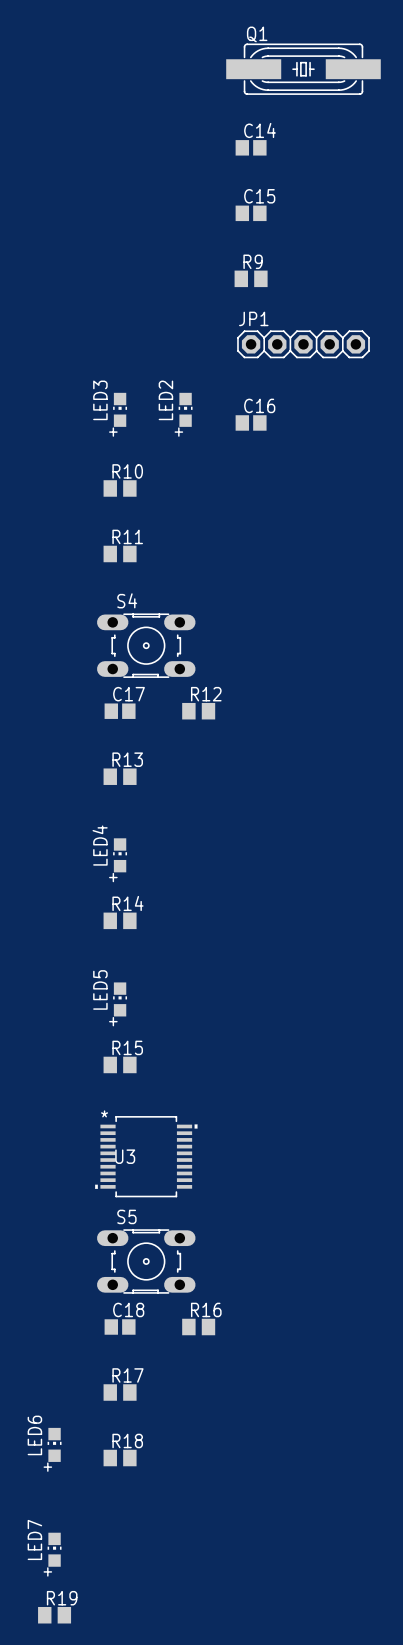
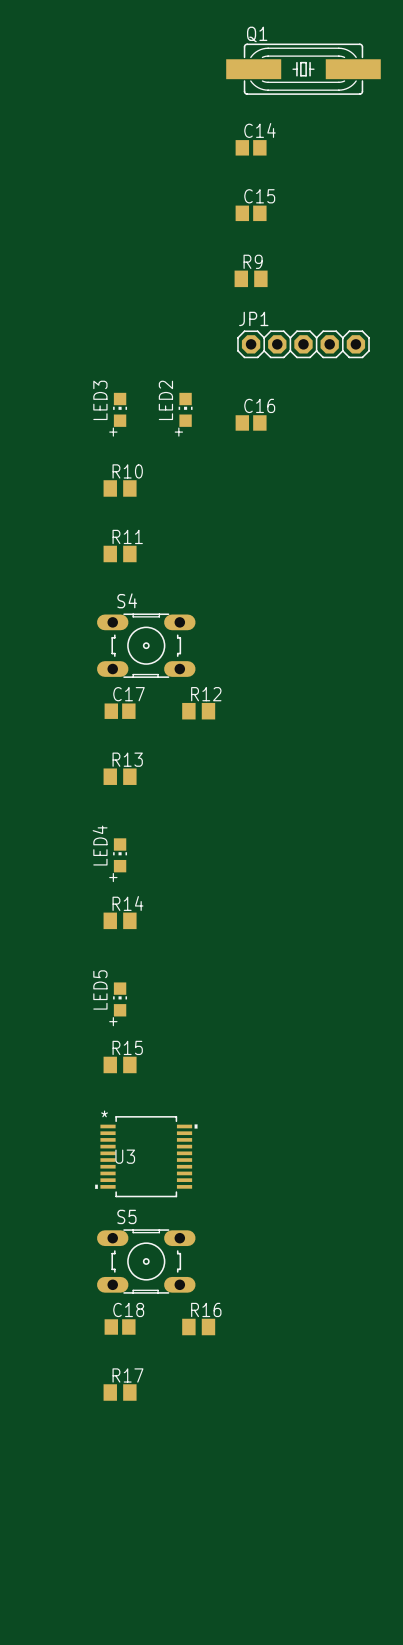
LED6: (54, 1444) -> none
R18: (120, 1458) -> none
LED7: (54, 1549) -> none
R19: (54, 1615) -> none

